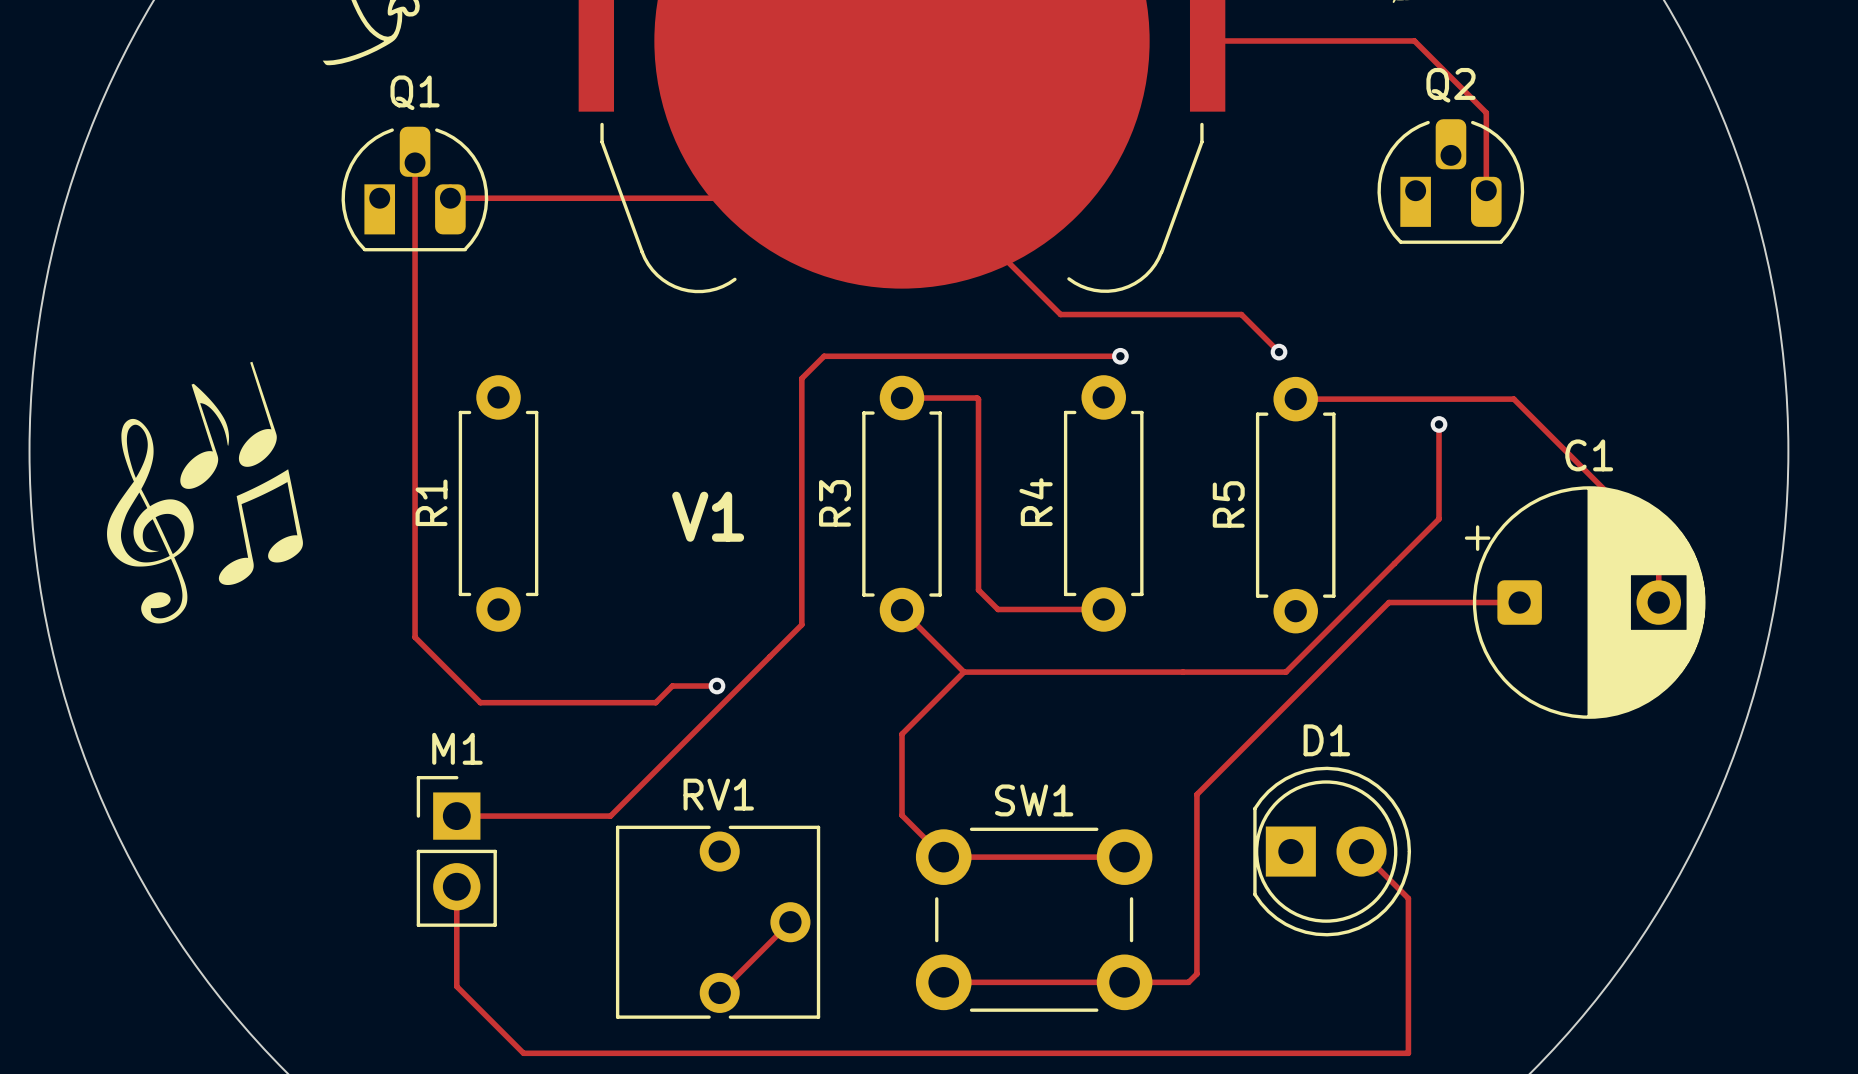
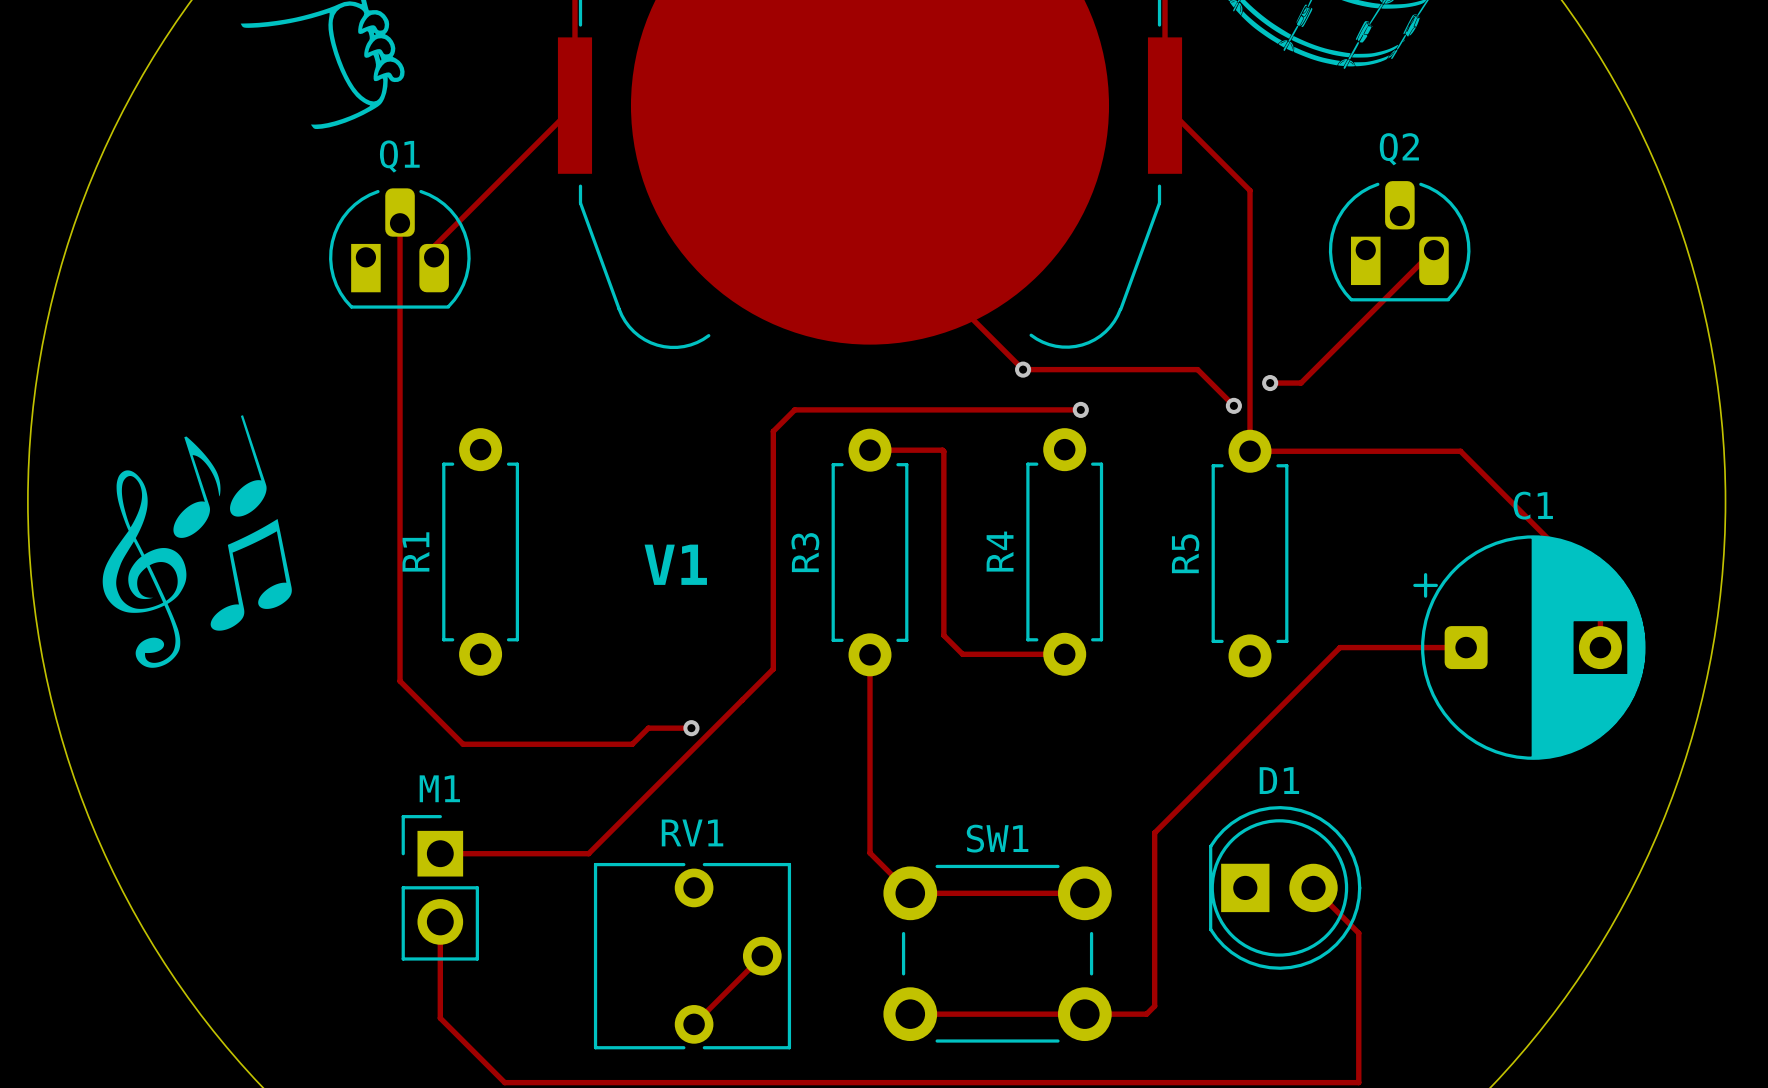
track: none -> (574, 105) (434, 246)
track: (901, 40) (744, 198) (450, 198) -> none
track: (1207, 40) (1414, 40) (1486, 112) (1486, 190) -> (1165, 105) (1250, 190) (1250, 451)
track: none -> (1433, 250) (1301, 383) (1270, 383)
via: none -> (1023, 369)
track: (1439, 424) (1439, 519) (1285, 672) (964, 672) -> none
via position: (1439, 424) -> (1270, 383)
track: (901, 610) (964, 672) -> (870, 654) (870, 774)
track: (964, 672) (901, 734) -> none

